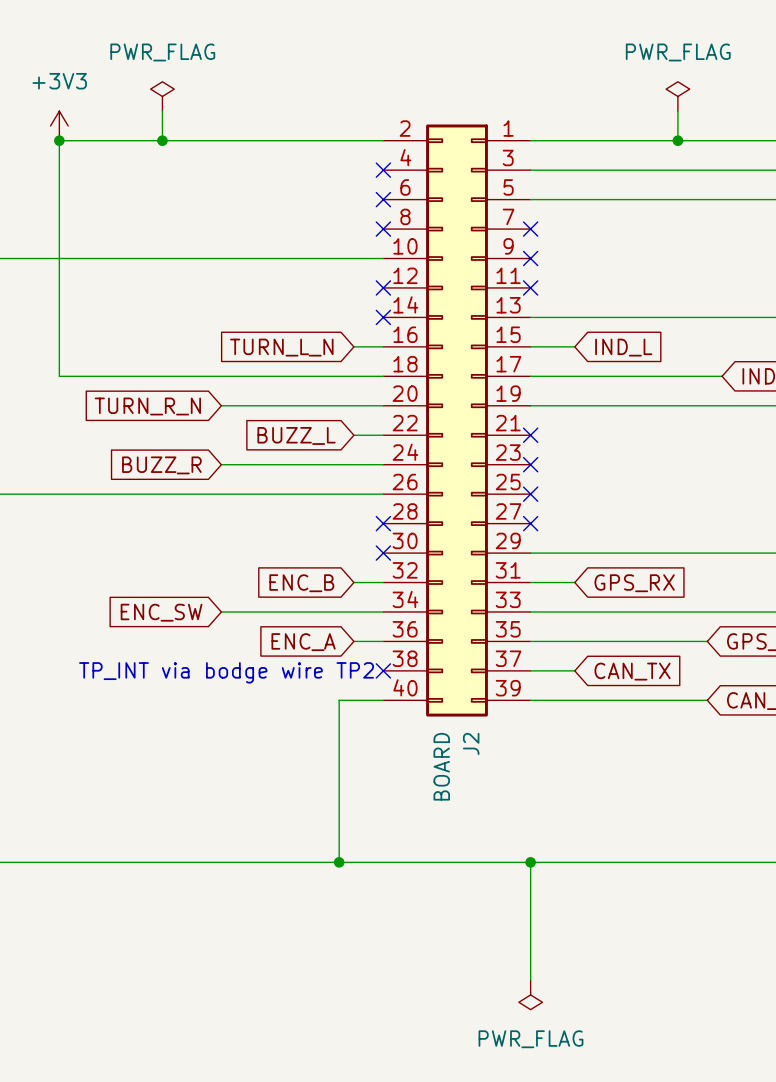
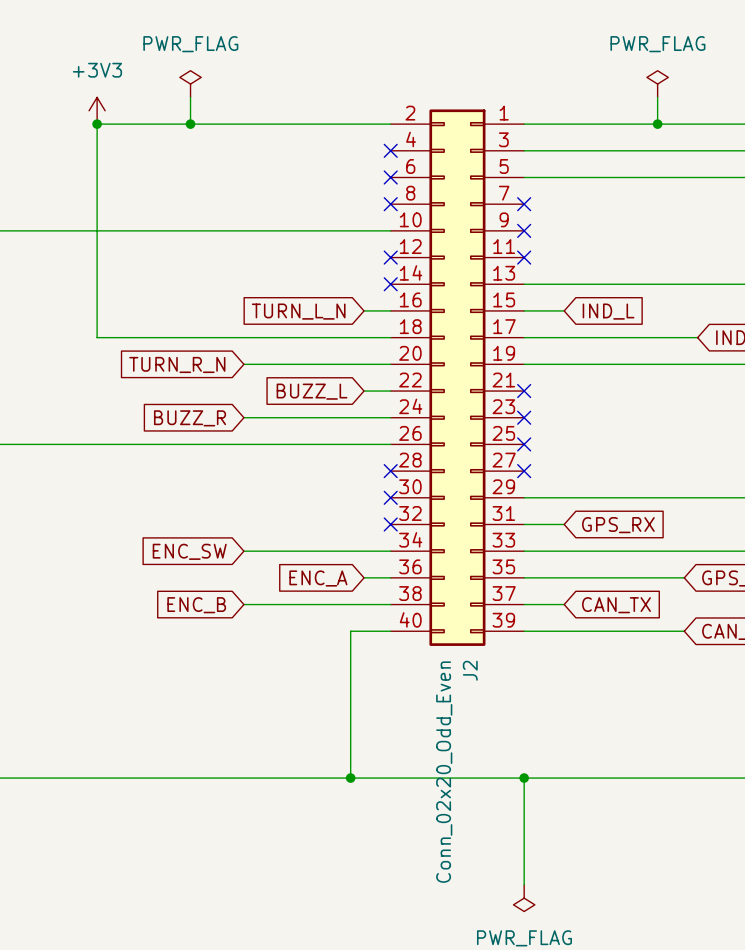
wire: (353, 582) (383, 582) -> none
no-connect mark: none -> (390, 524)
global label position: ENC_B (301, 583) -> ENC_B (196, 605)
wire: none -> (243, 604) (390, 604)
no-connect mark: (383, 670) -> none
text: TP_INT via bodge wire TP2 (226, 672) -> none
J2 value: BOARD (441, 766) -> Conn_02x20_Odd_Even (444, 772)

